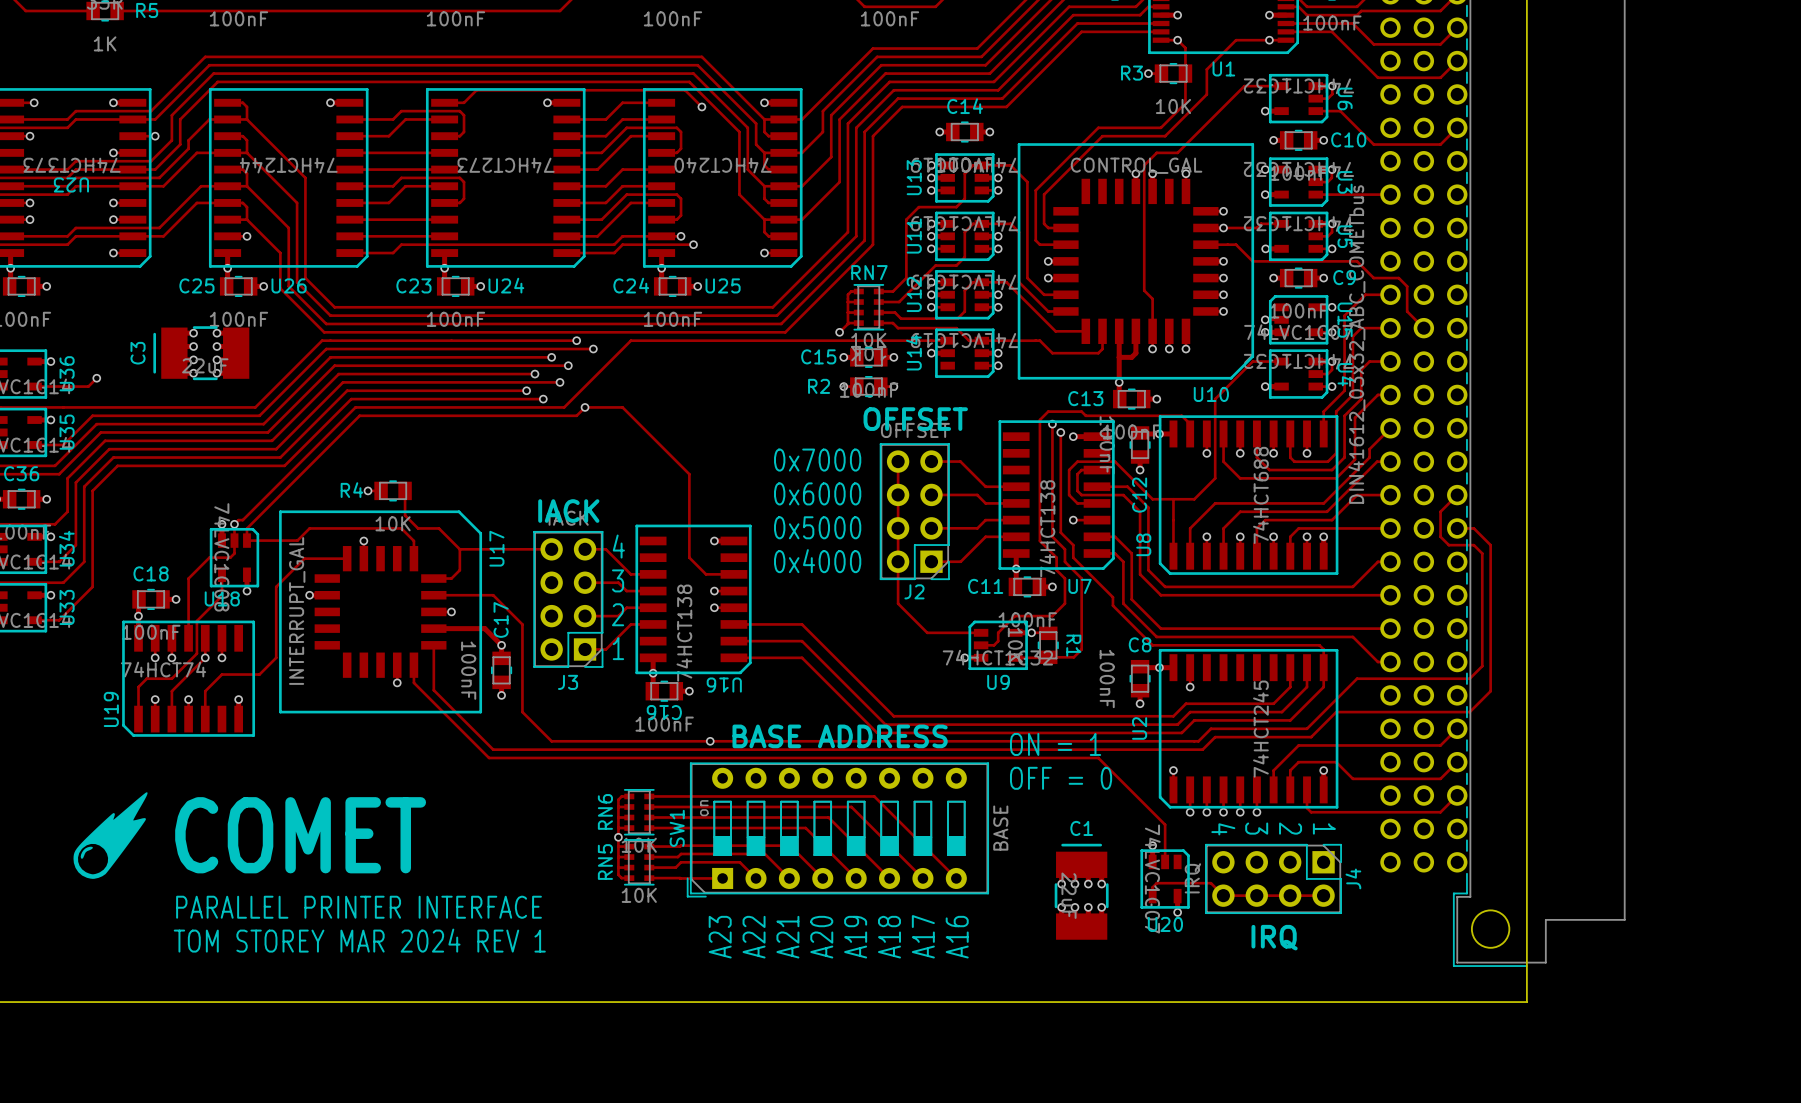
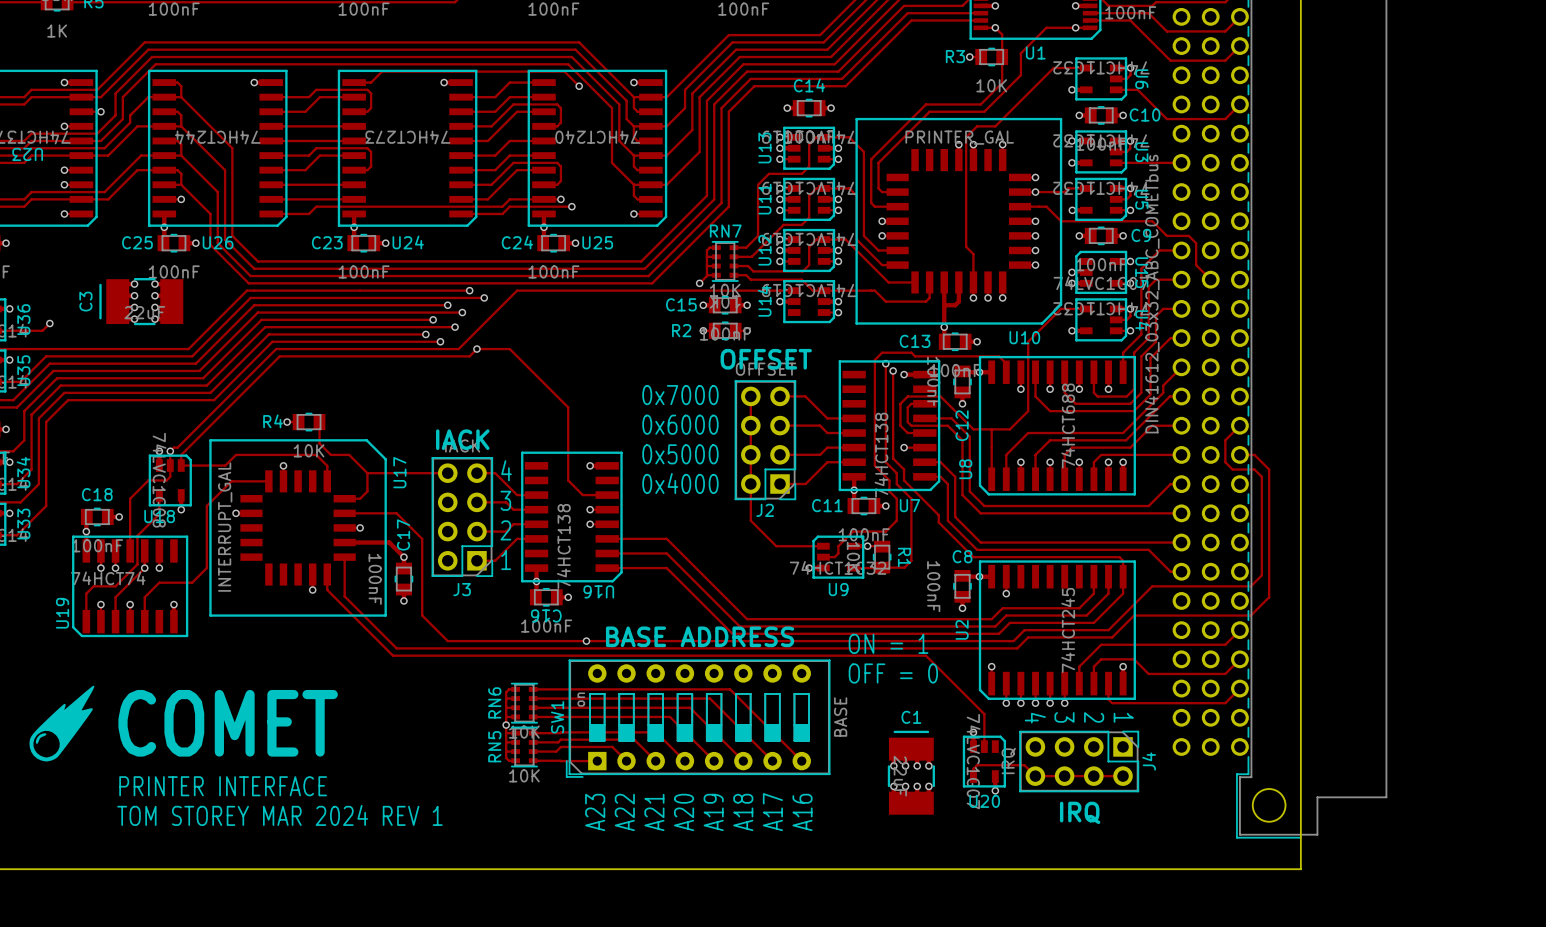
U10 value: CONTROL_GAL (1136, 165) -> PRINTER_GAL (959, 137)
text: PARALLEL PRINTER INTERFACE (359, 907) -> PRINTER INTERFACE (223, 786)

